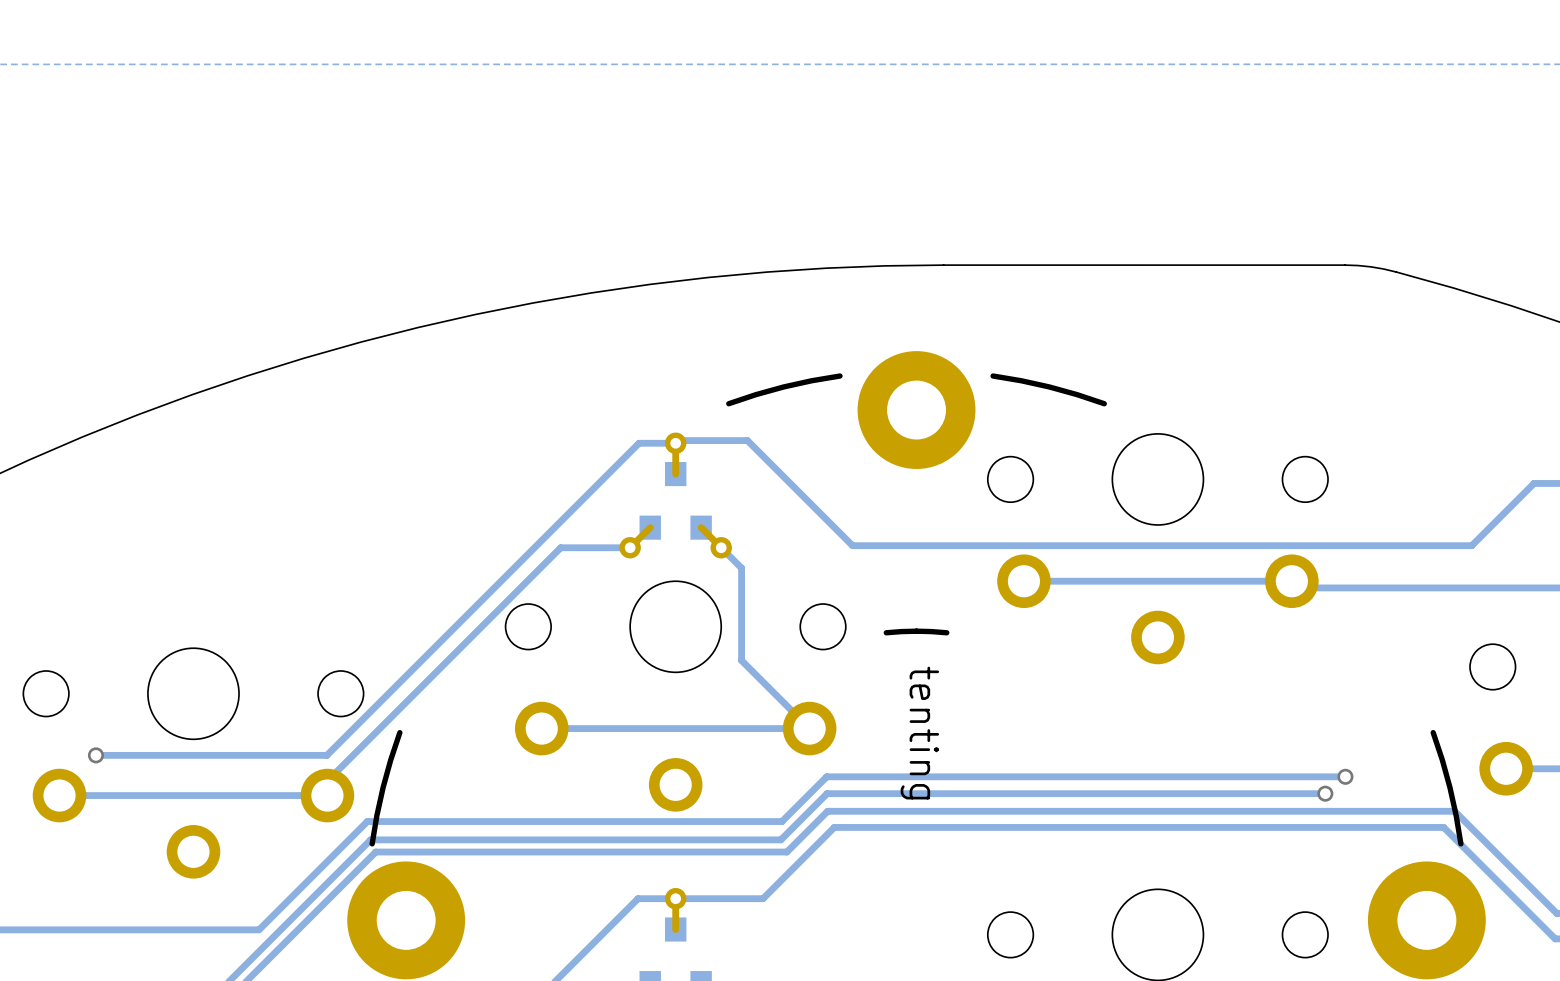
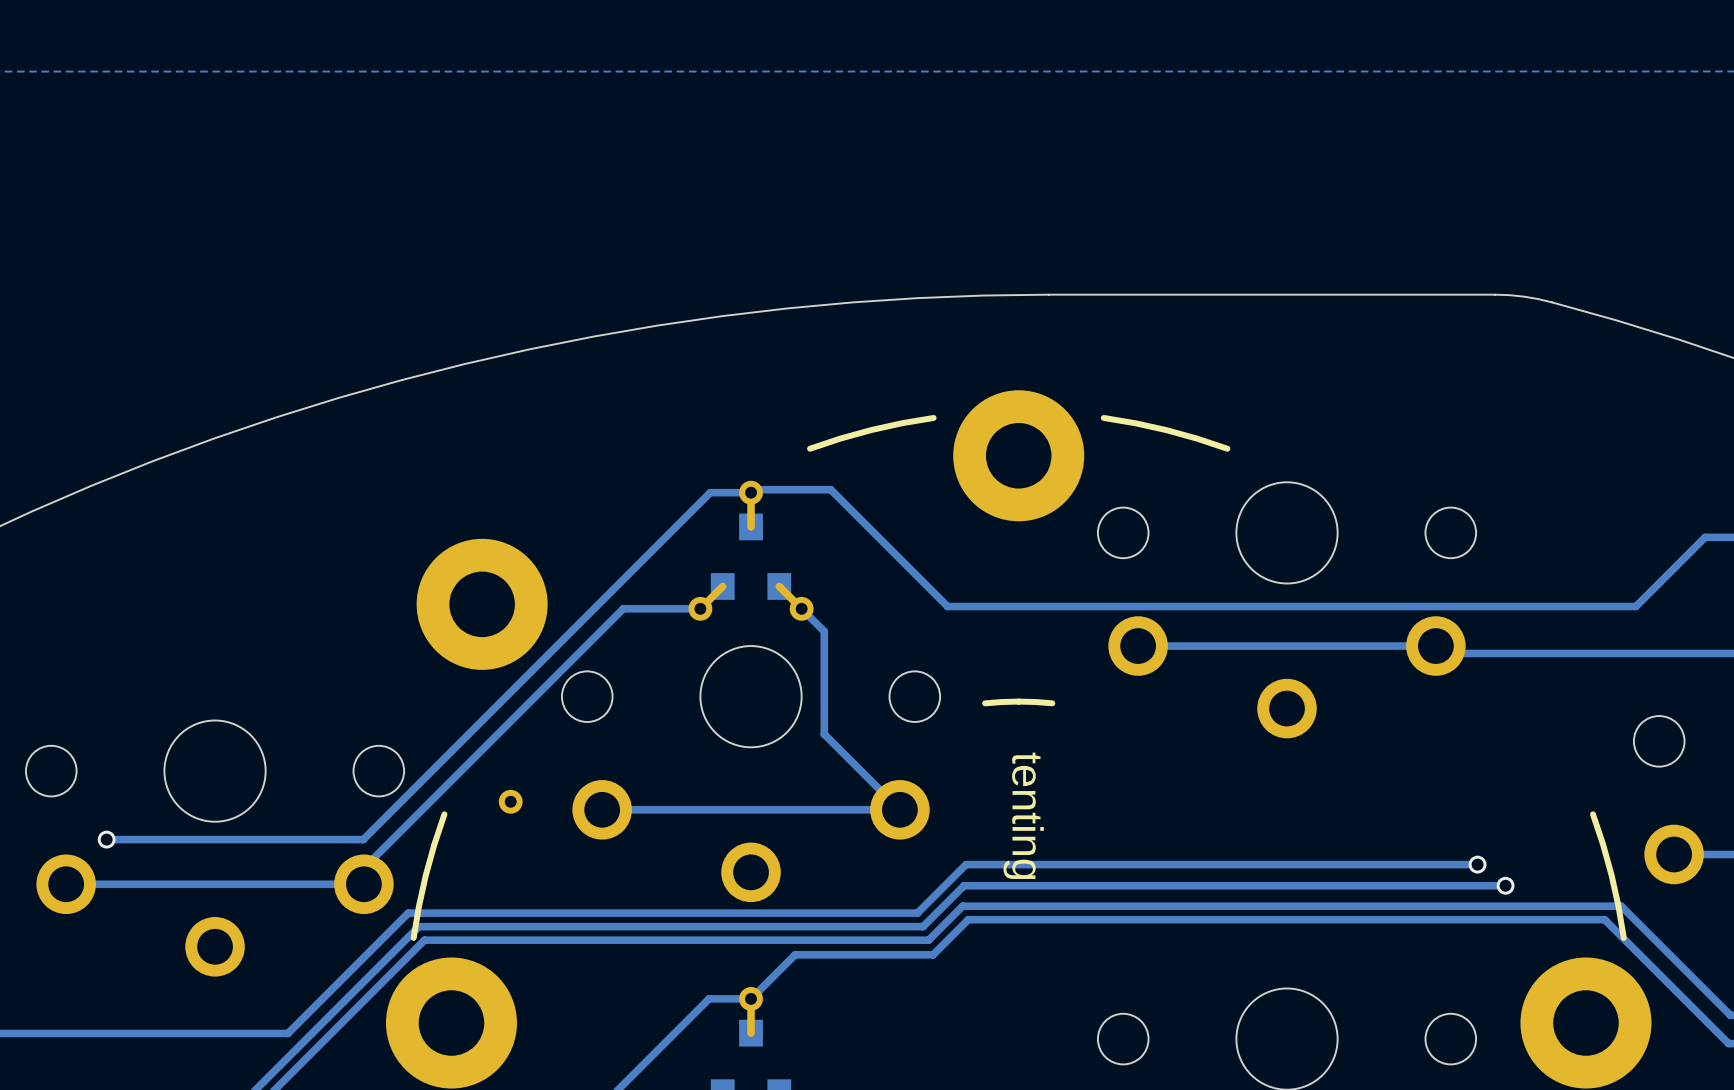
part: none -> (482, 604)
part: none -> (510, 801)
track: (1345, 776) (826, 776) (781, 821) -> (1477, 864) (966, 864) (917, 913) (869, 913)
via: (1345, 776) -> none
via: none -> (1477, 864)
track: (1325, 793) (827, 793) (780, 839) (370, 839) -> (1505, 885) (963, 885) (923, 926) (418, 926) (412, 933)
via: (1325, 793) -> none
via: none -> (1505, 885)
track: (1458, 815) (1454, 811) (827, 811) (786, 852) (375, 852) -> (1621, 906) (962, 906) (928, 940) (424, 940) (417, 947)
track: (871, 827) (834, 827) (763, 898) (675, 898) -> (968, 919) (933, 954) (795, 954) (751, 998)

